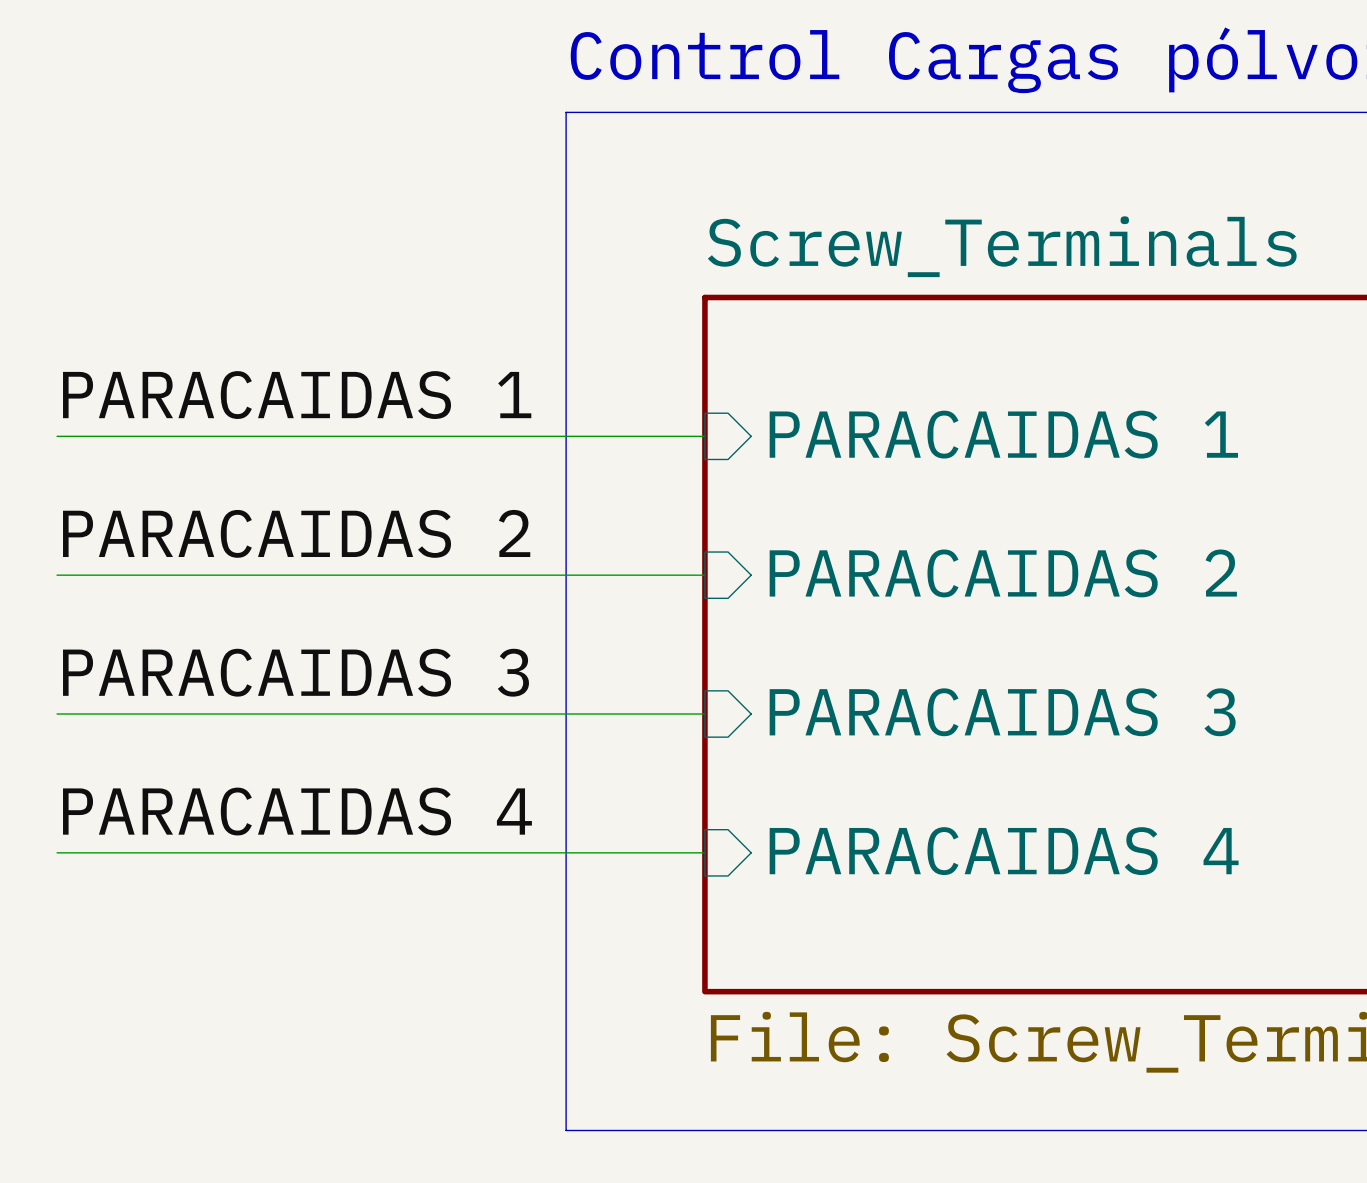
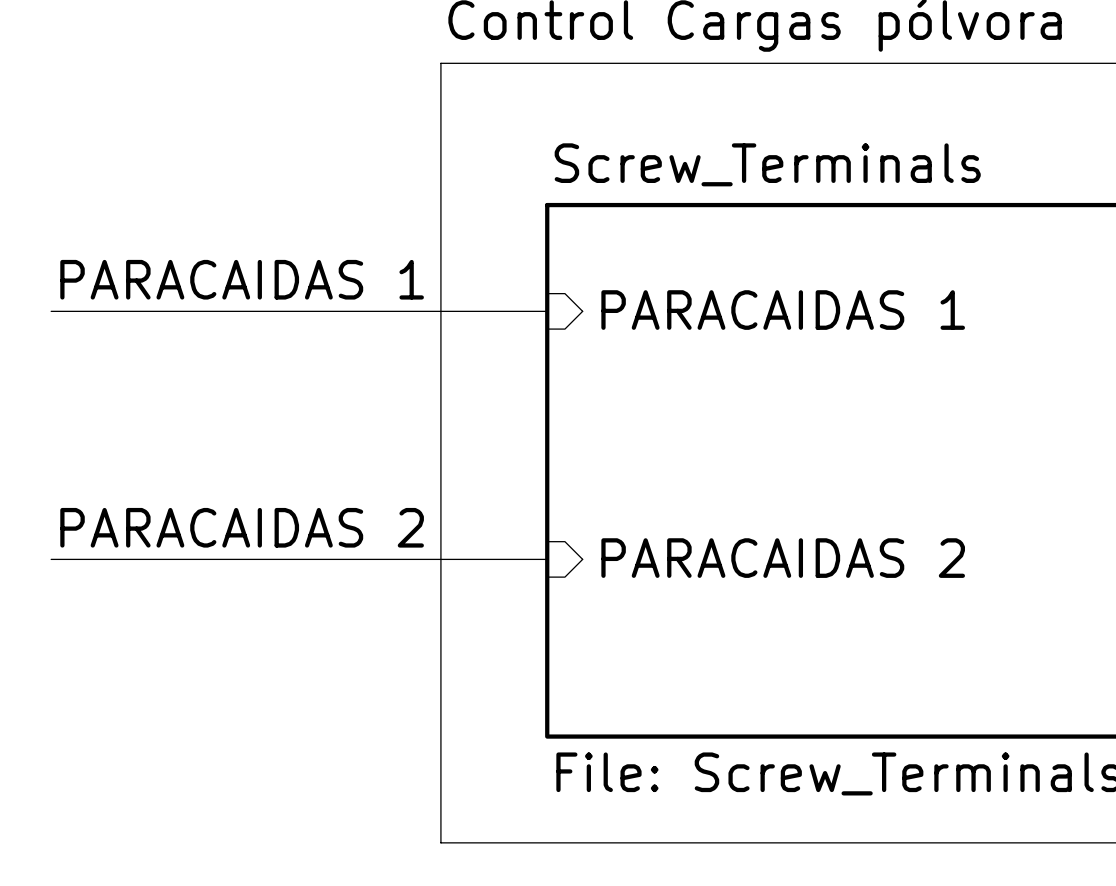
label position: PARACAIDAS 2 (296, 533) -> PARACAIDAS 2 (242, 527)
sheet pin position: PARACAIDAS 2 (1003, 573) -> PARACAIDAS 2 (783, 558)
wire: (57, 575) (704, 575) -> none
label: PARACAIDAS 3 (296, 672) -> none
sheet pin: PARACAIDAS 3 (1002, 712) -> none
wire: (57, 714) (704, 714) -> (51, 559) (547, 559)
label: PARACAIDAS 4 (297, 811) -> none
sheet pin: PARACAIDAS 4 (1004, 851) -> none
wire: (57, 852) (704, 852) -> none

